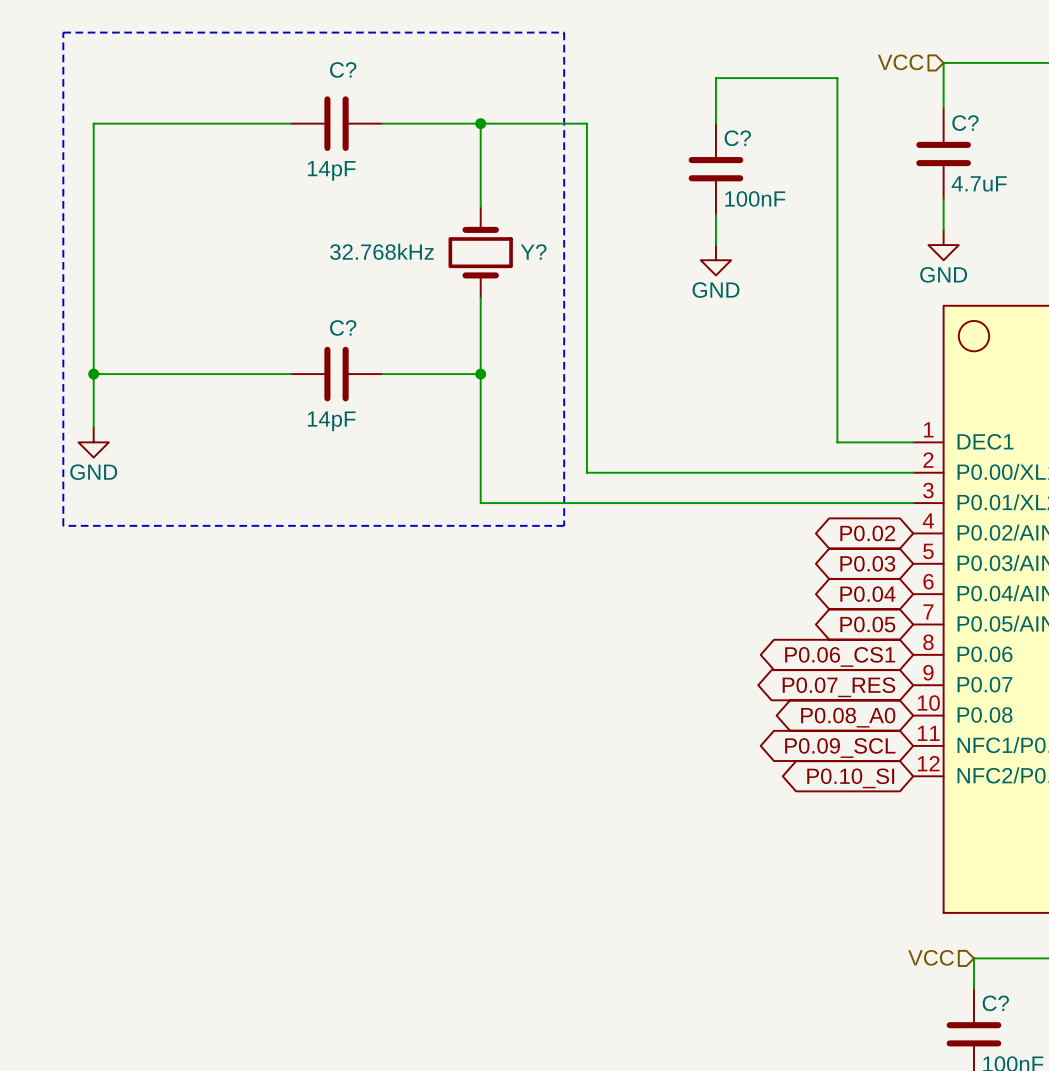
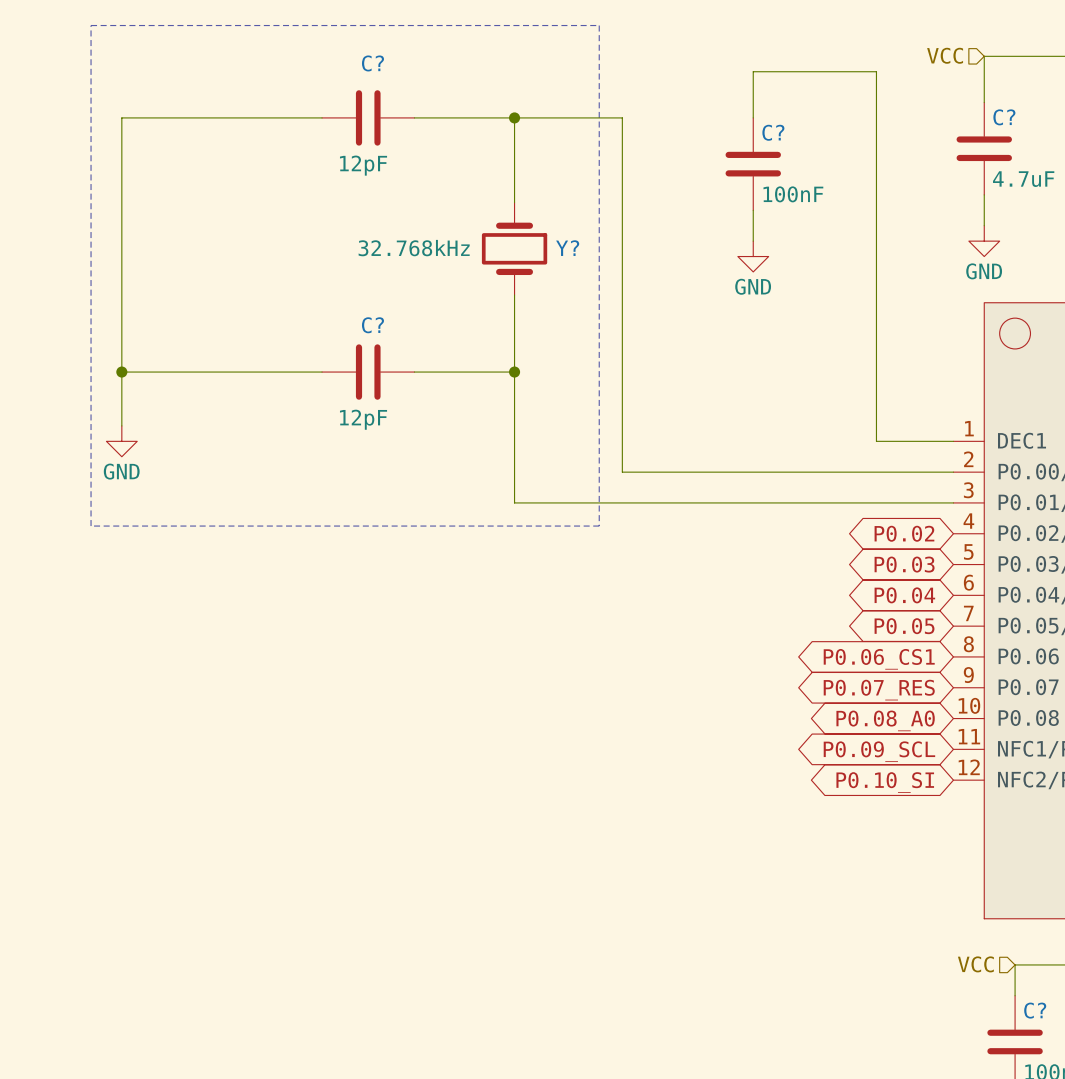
C? value: 14pF (331, 170) -> 12pF (363, 165)
C? value: 14pF (331, 421) -> 12pF (363, 419)

